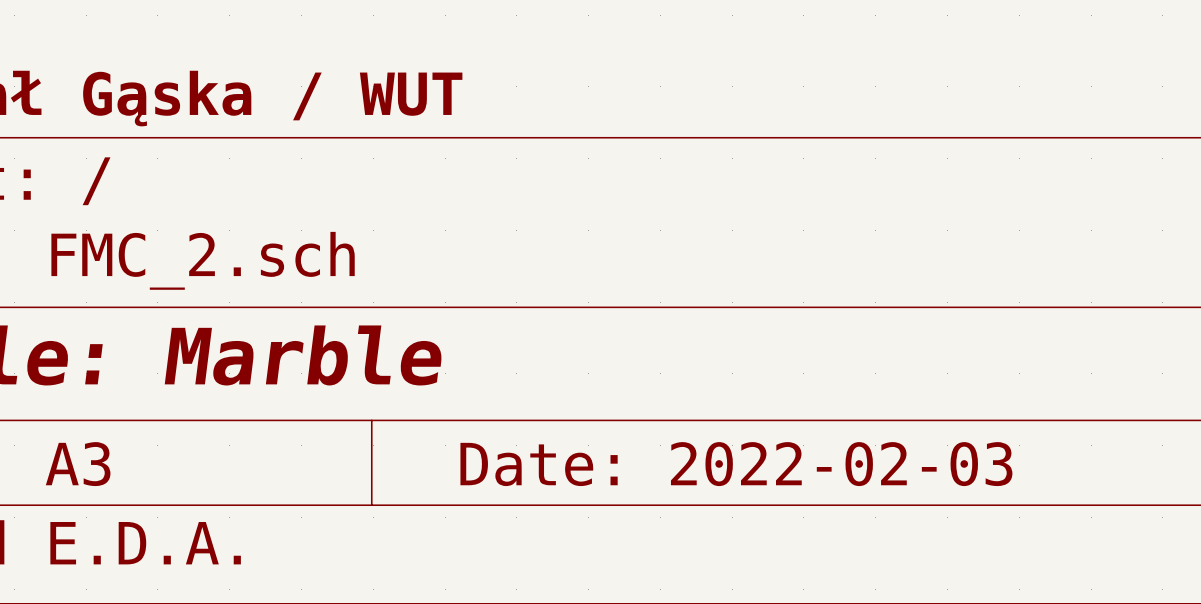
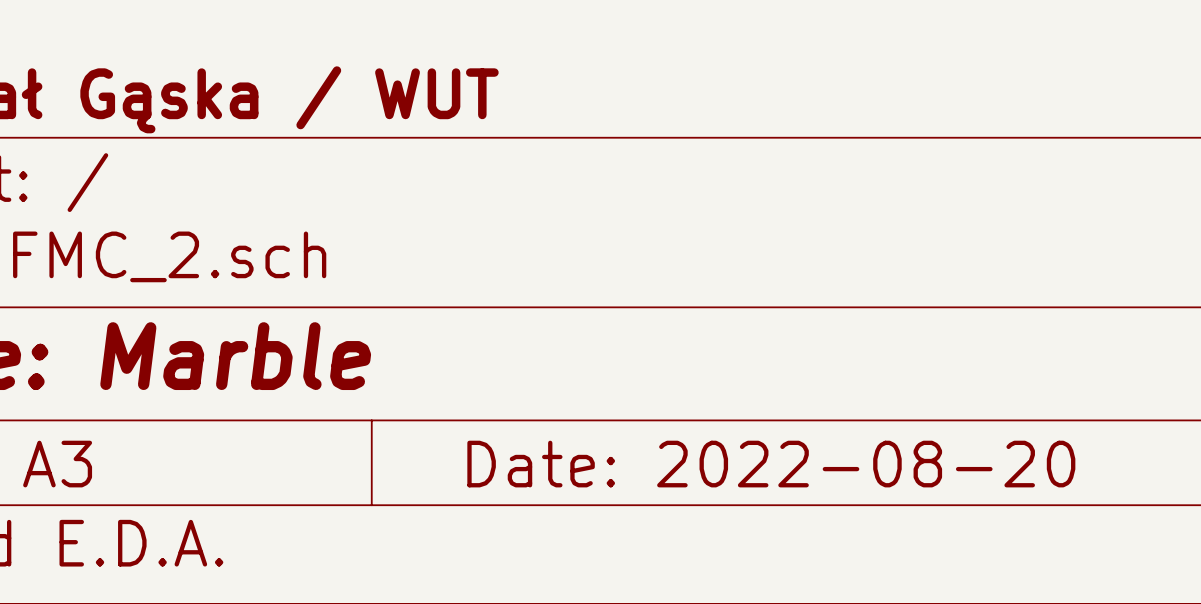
title block: Date: 2022-02-03 (736, 464) -> Date: 2022-08-20 (771, 464)

